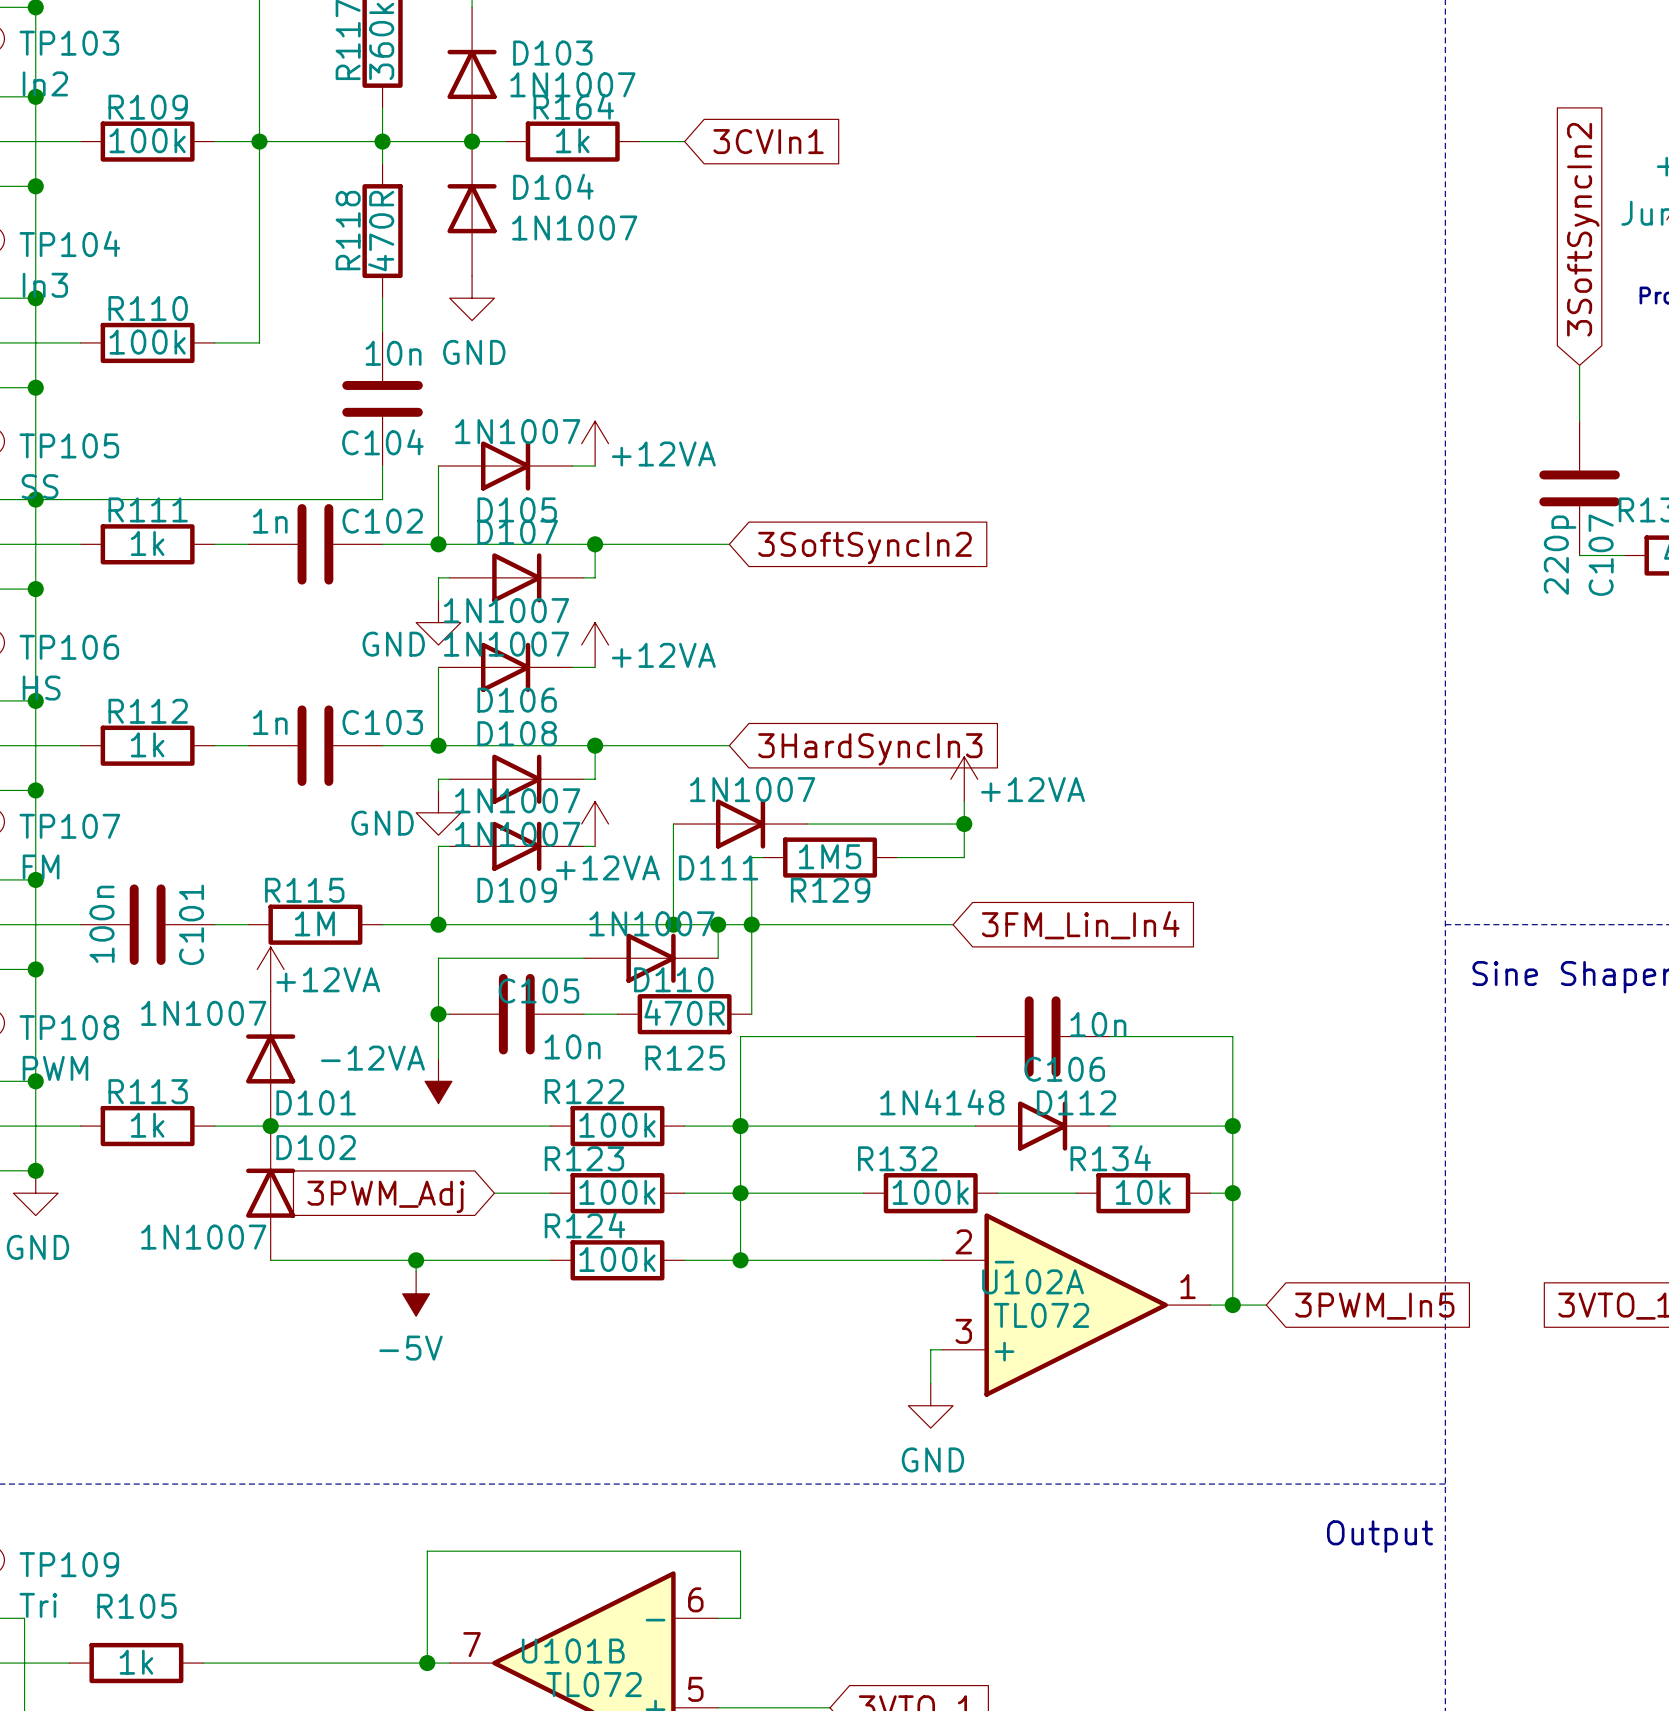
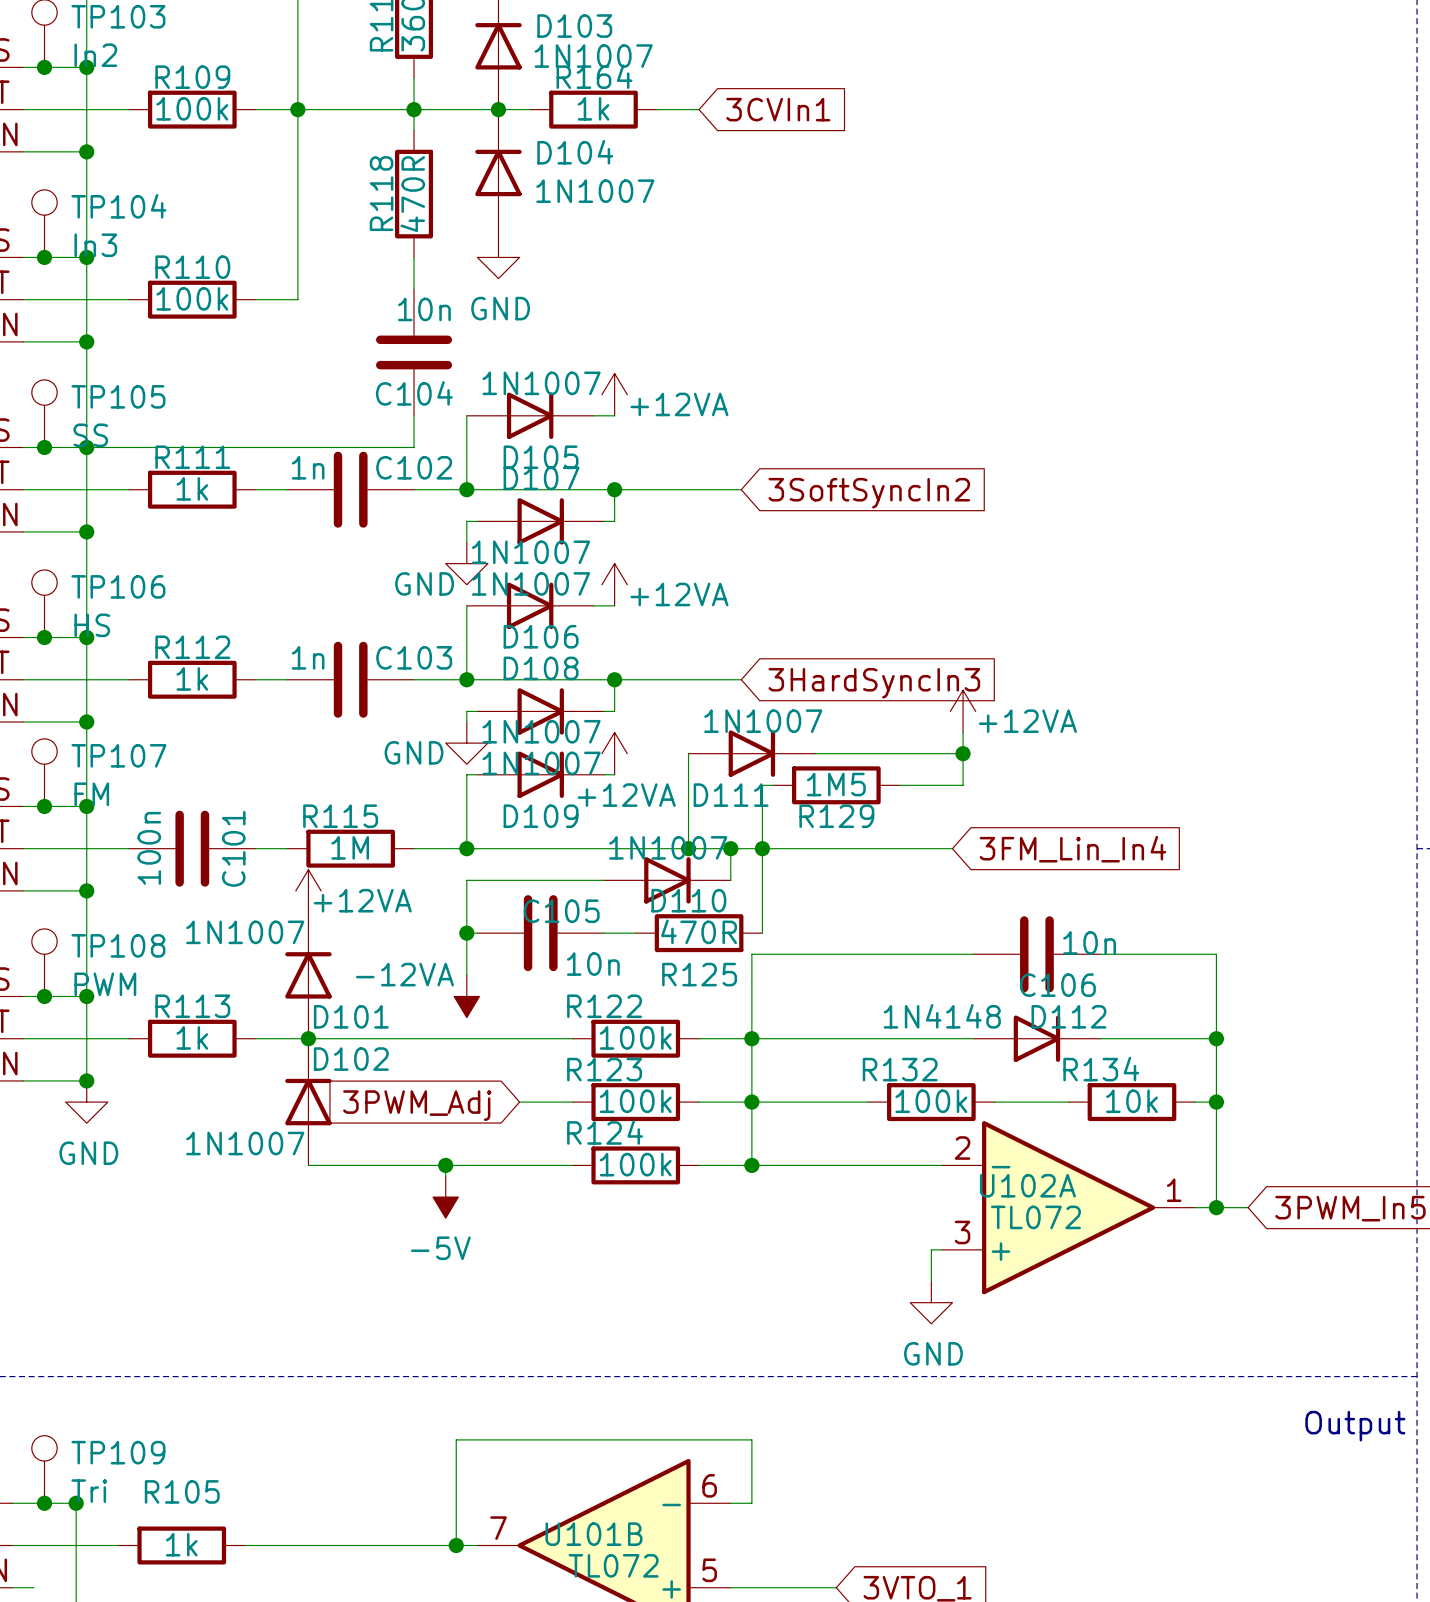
junction: none -> (76, 1503)

